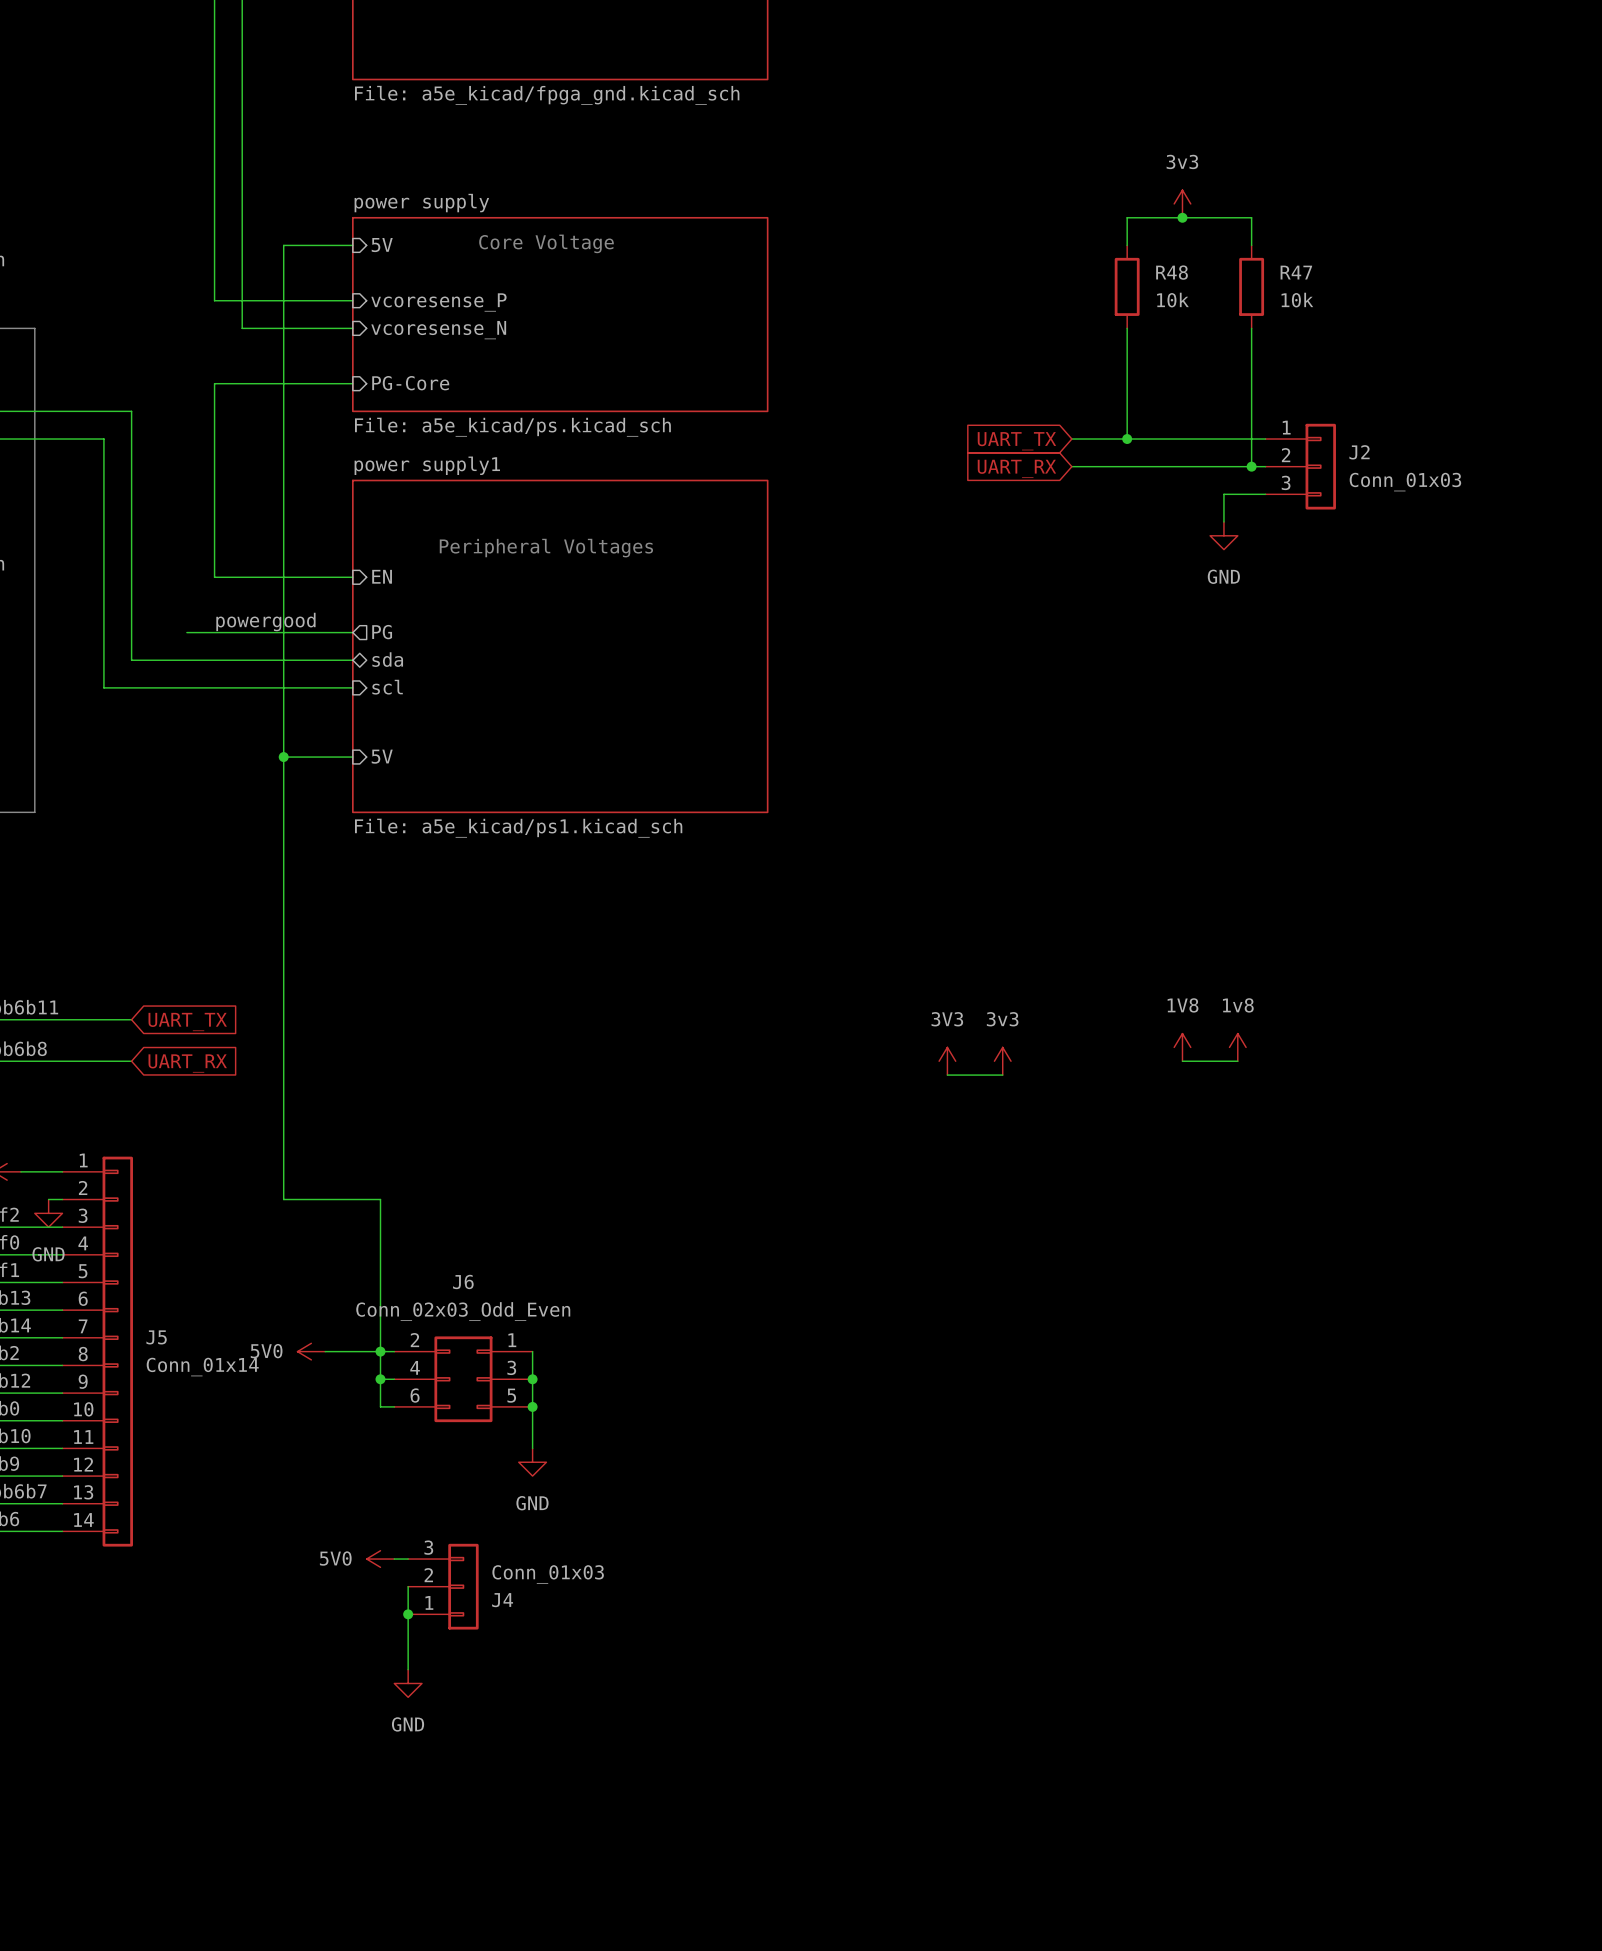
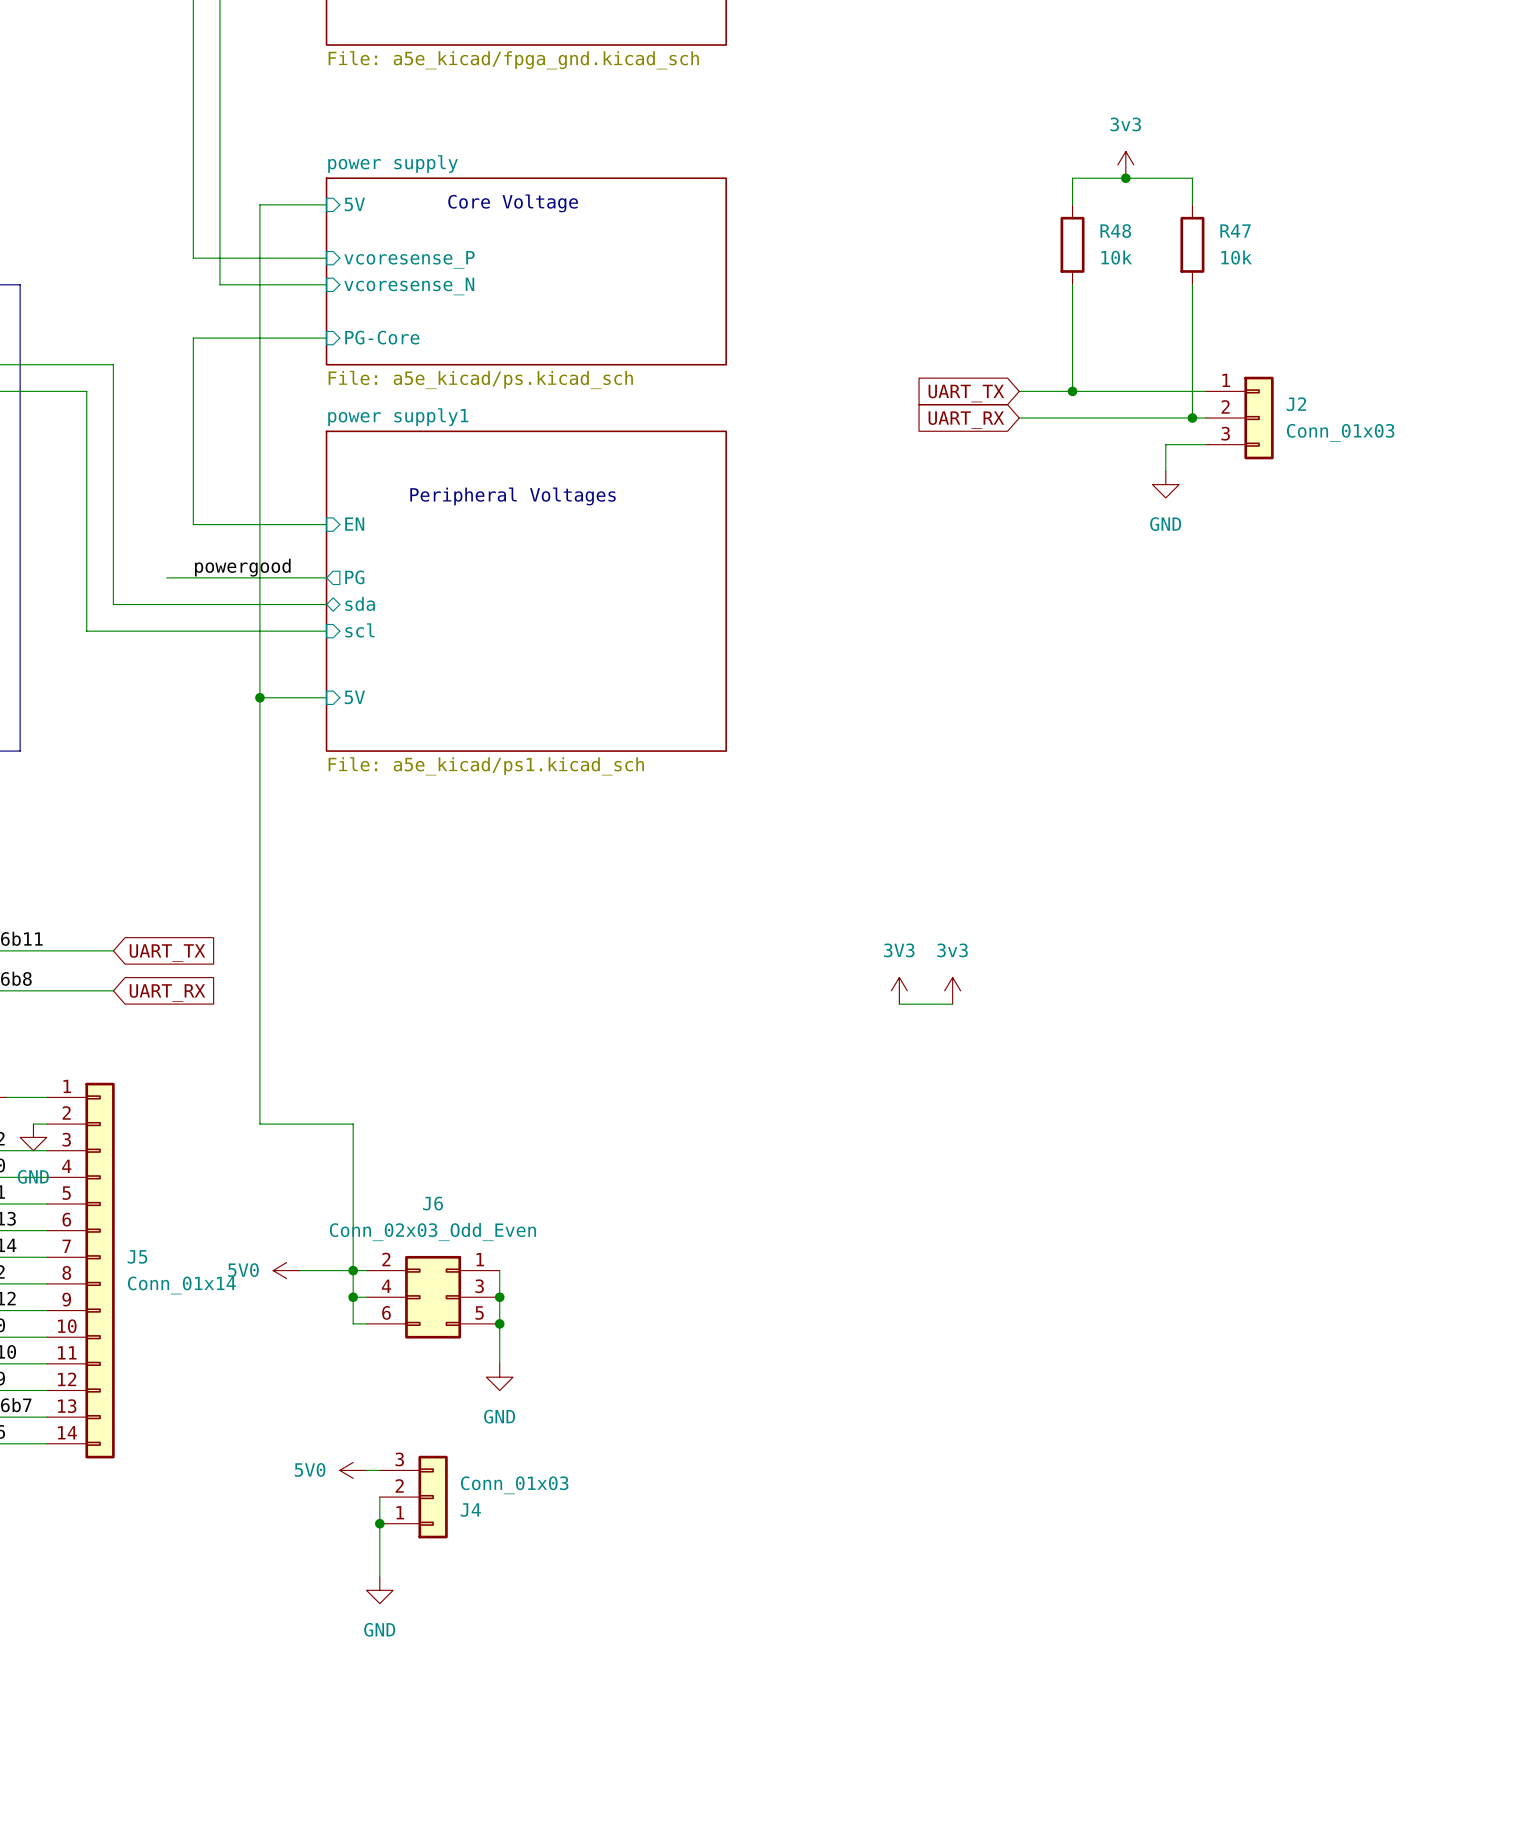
power symbol: 1V8 (1182, 1047) -> none
power symbol: 1v8 (1237, 1047) -> none
wire: (1182, 1061) (1237, 1061) -> none

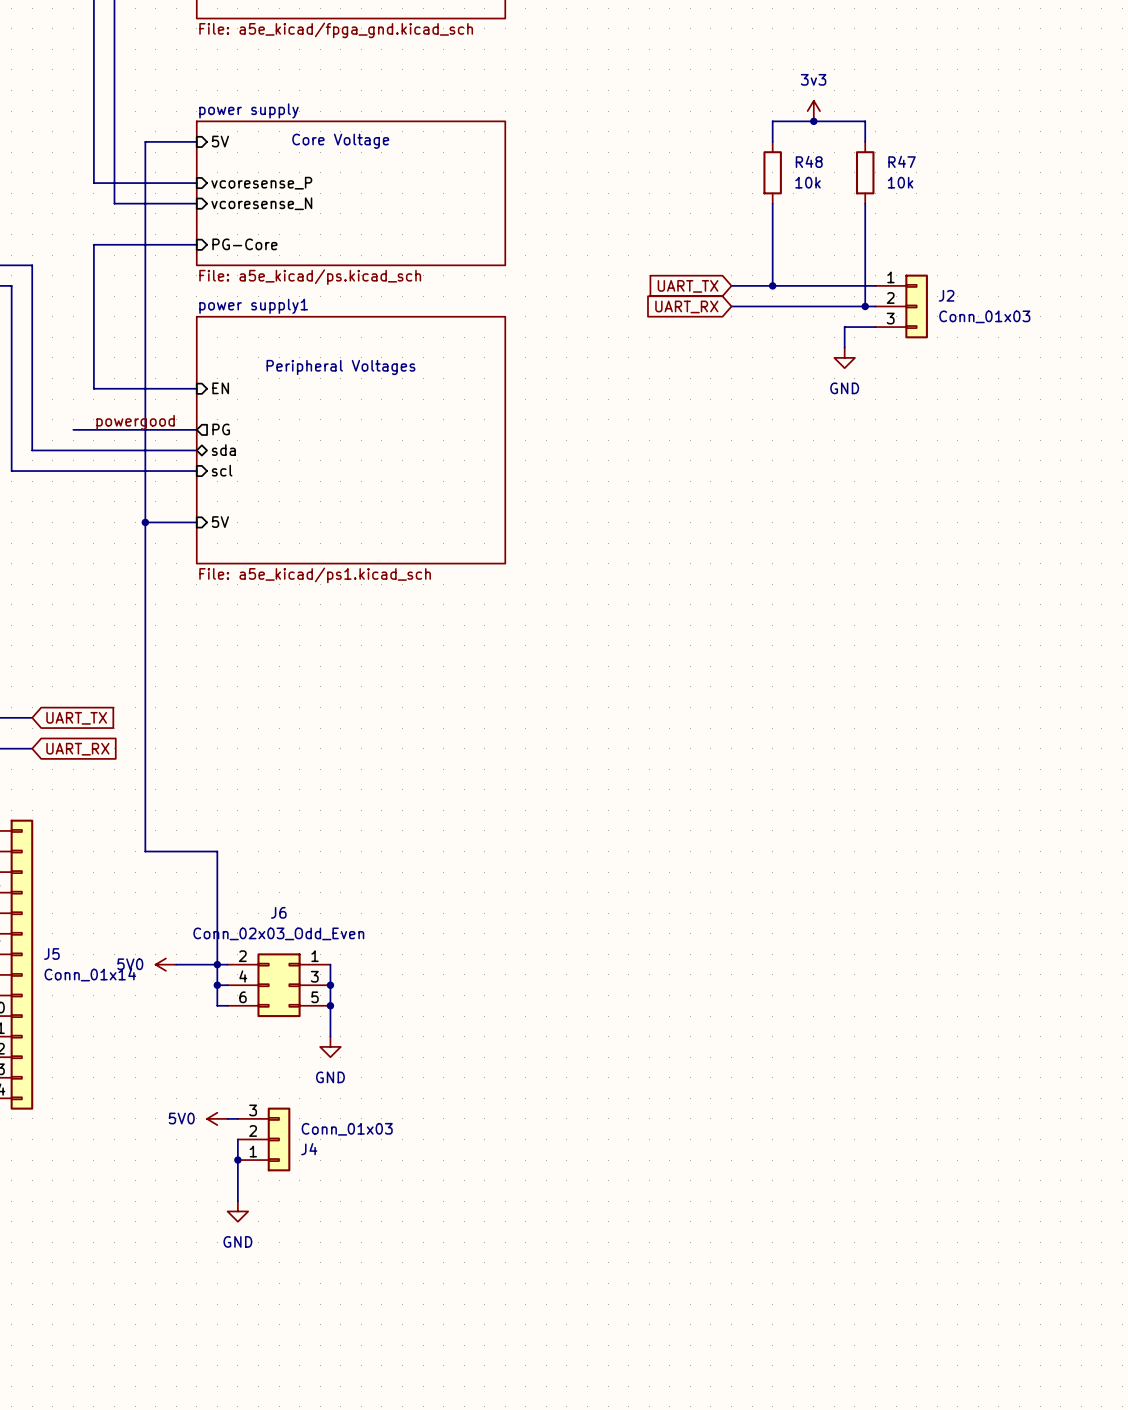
power symbol: 3V3 (899, 990) -> none
power symbol: 3v3 (952, 990) -> none
wire: (899, 1004) (952, 1004) -> none

